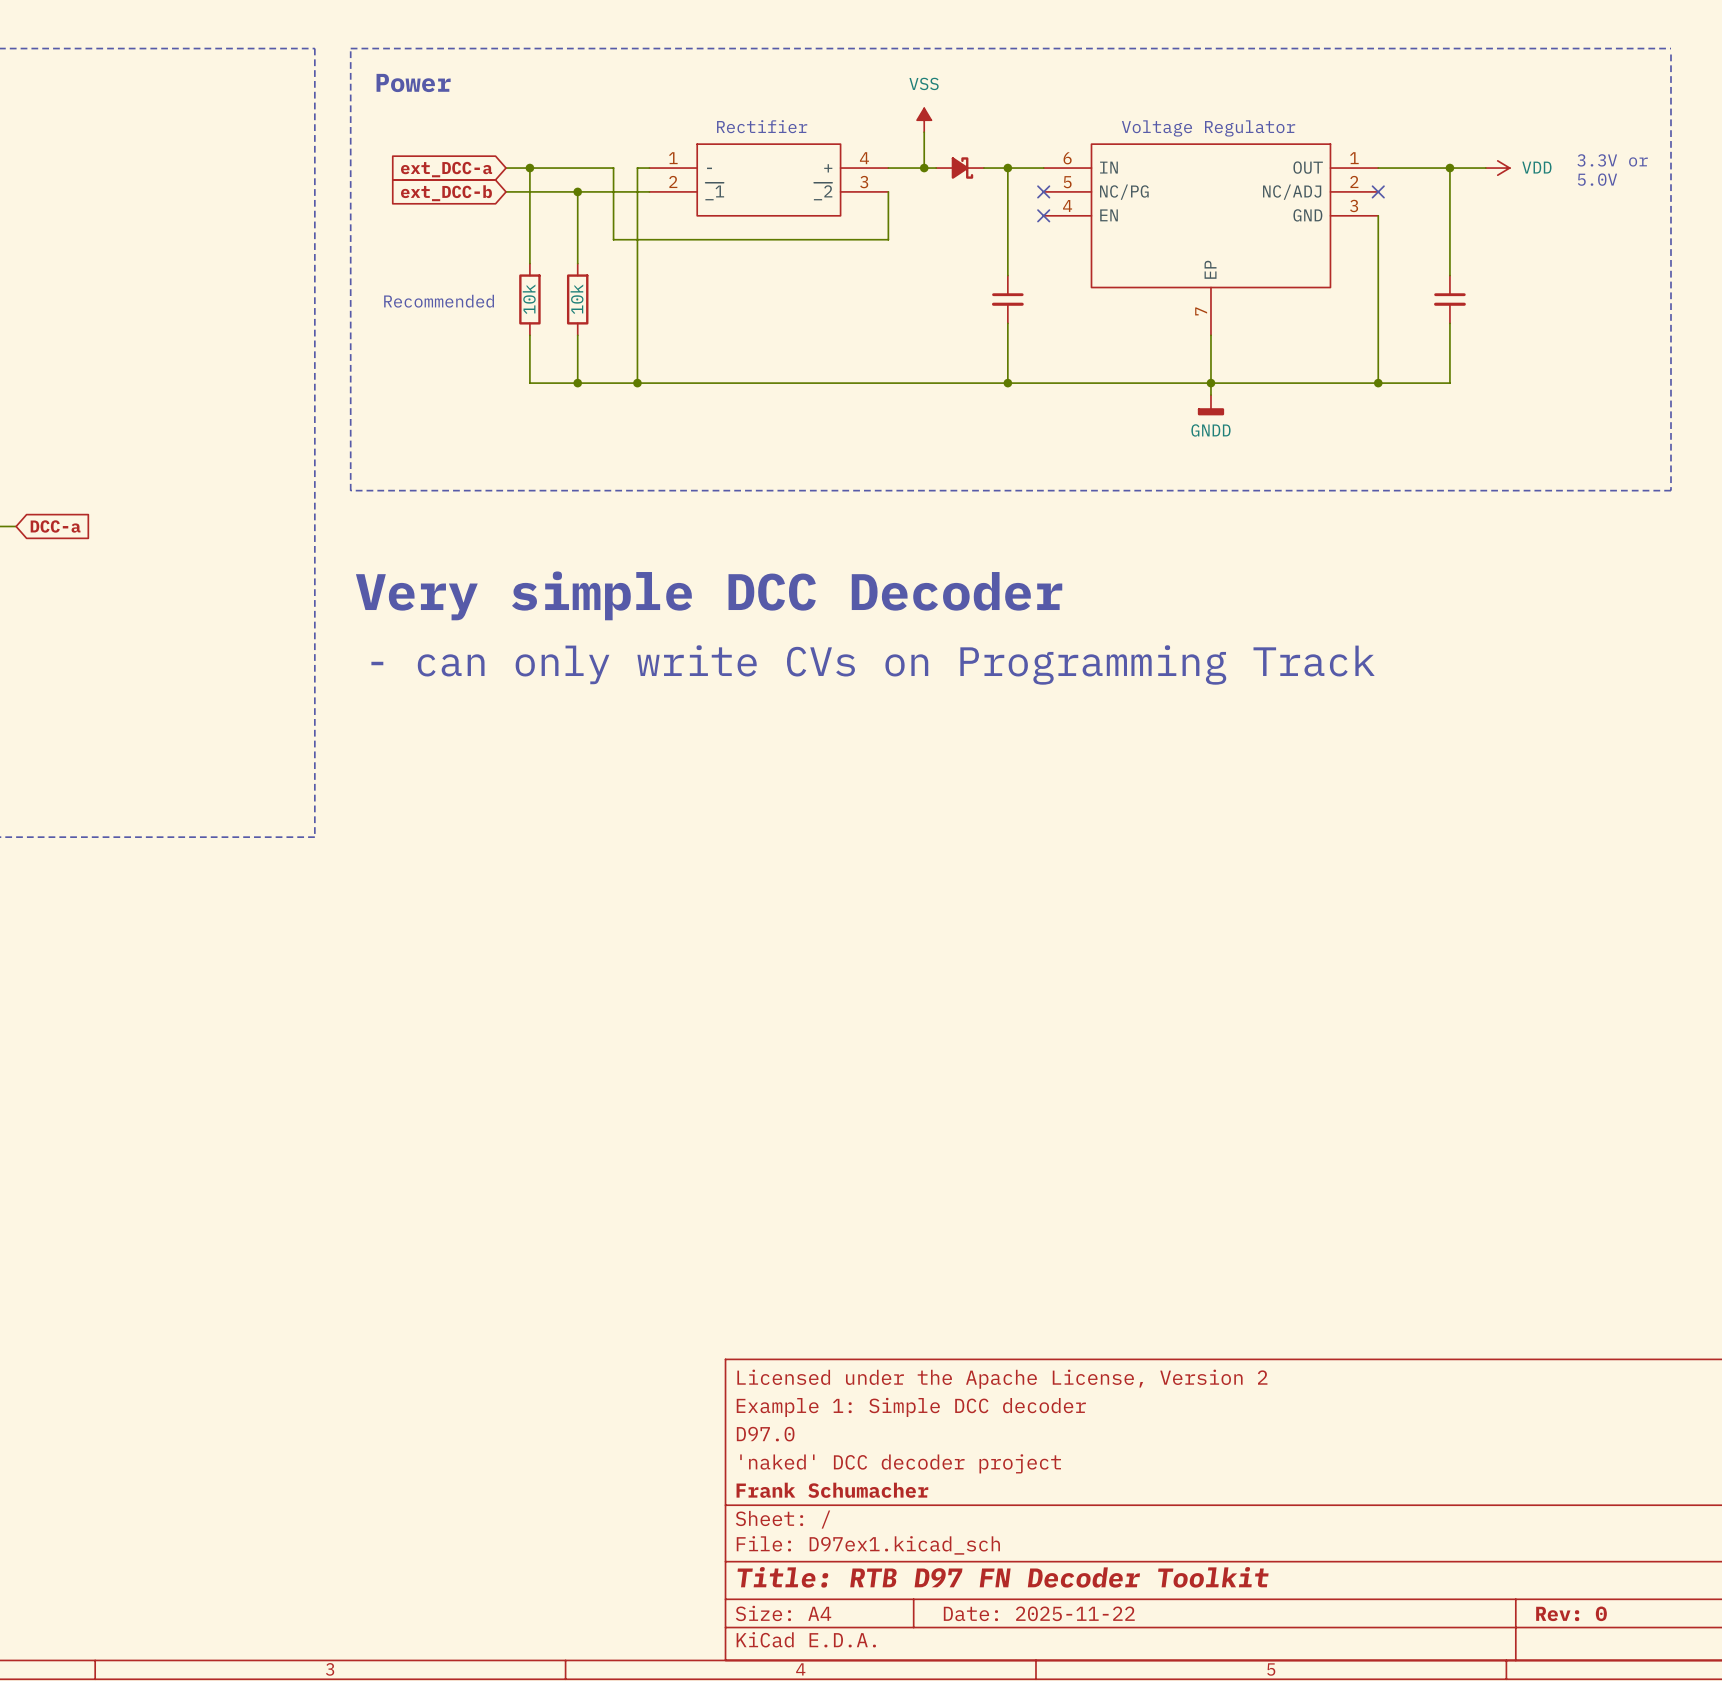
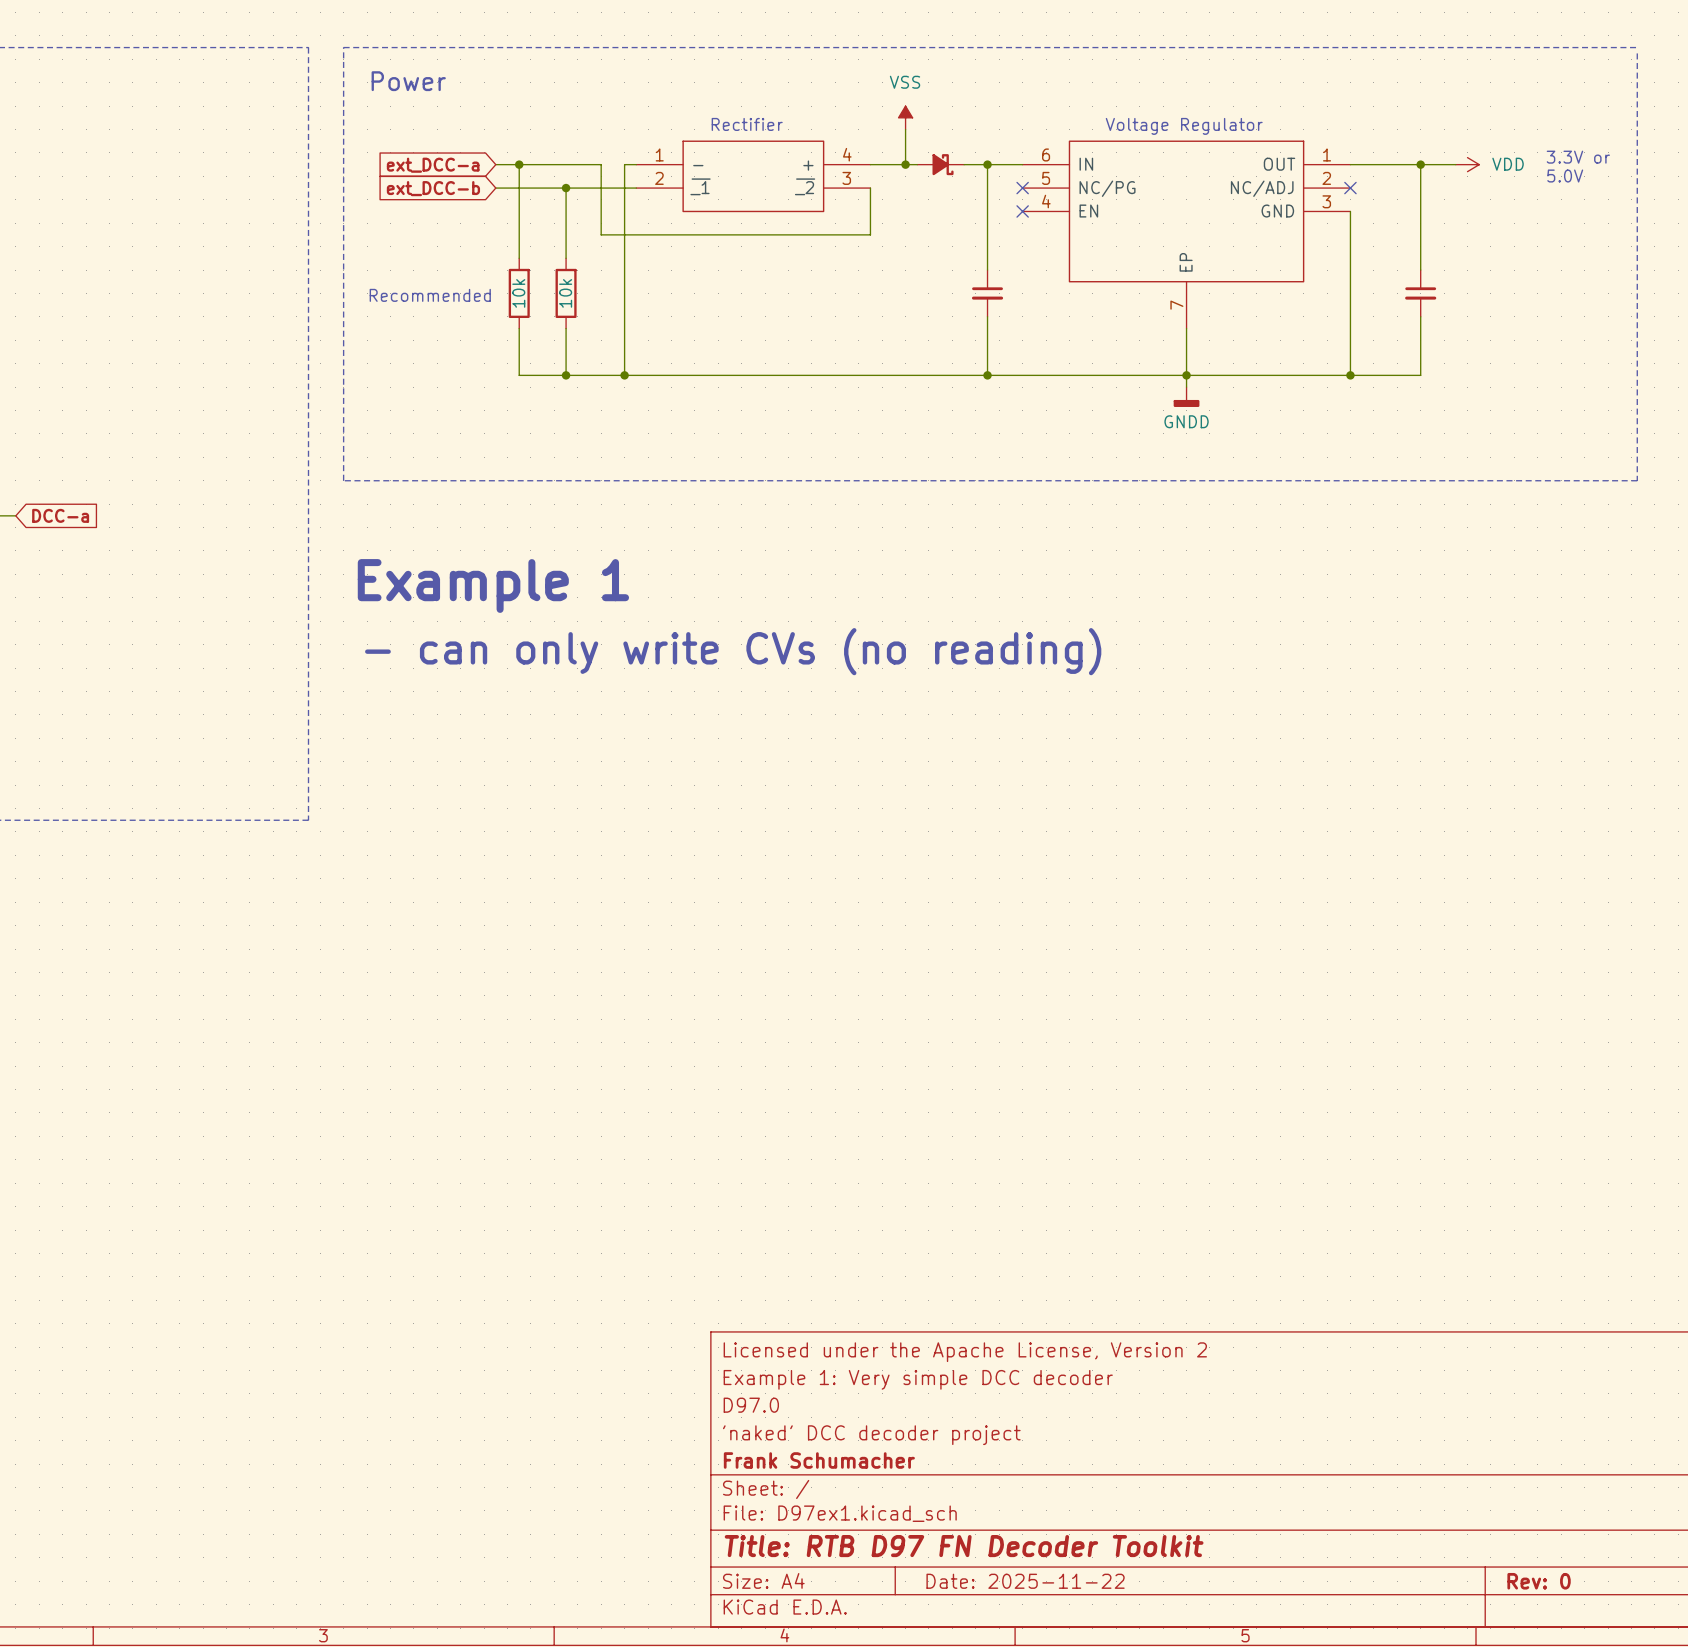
text: Very simple DCC Decoder (709, 595) -> Example 1 (493, 586)
text: - can only write CVs on Programming Track (873, 664) -> - can only write CVs (no reading) (733, 651)
title block: Example 1: Simple DCC decoder (911, 1407) -> Example 1: Very simple DCC decoder (918, 1379)

